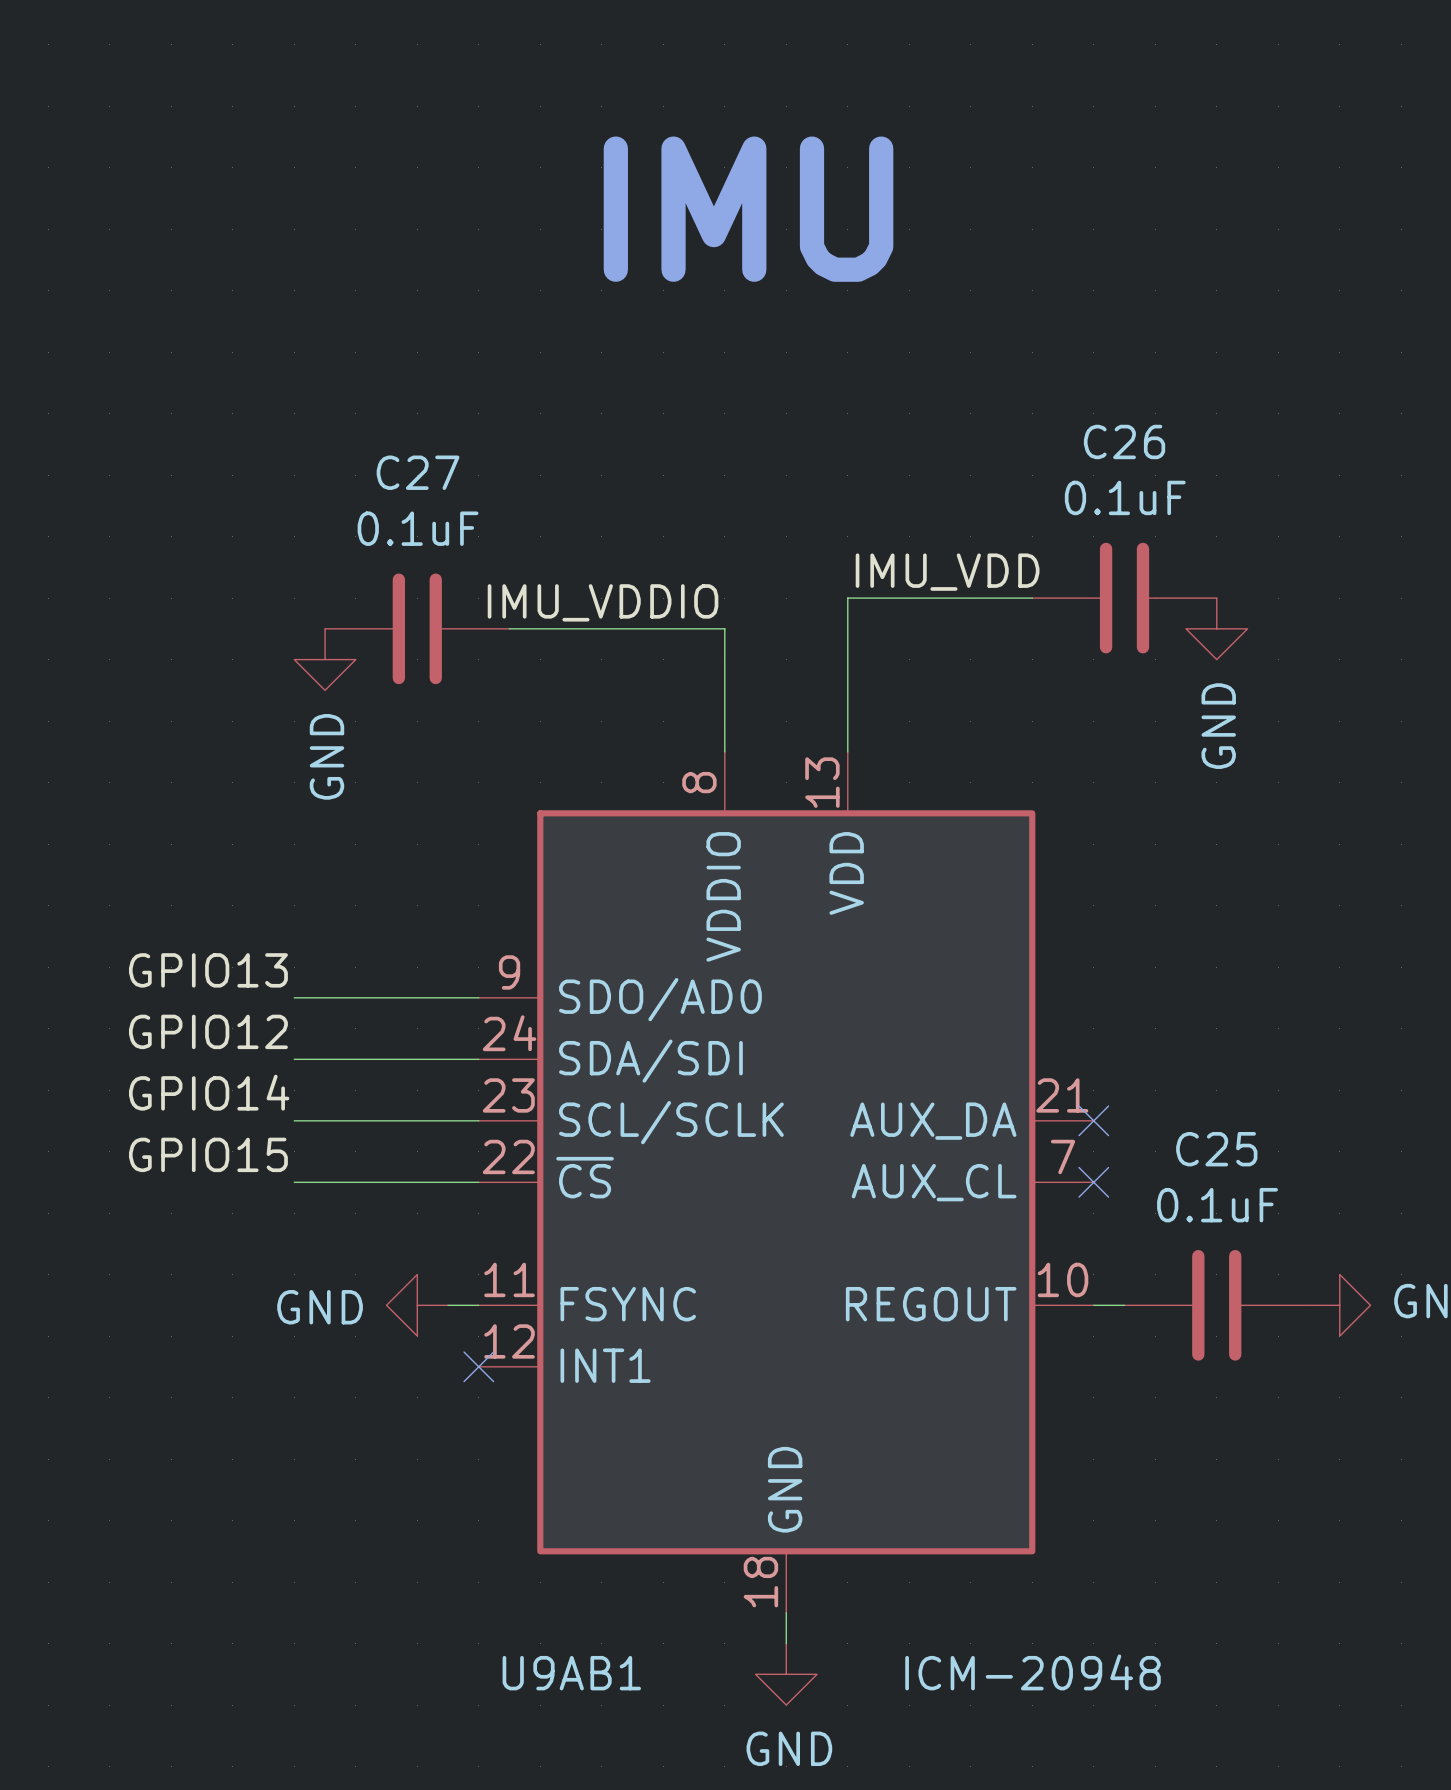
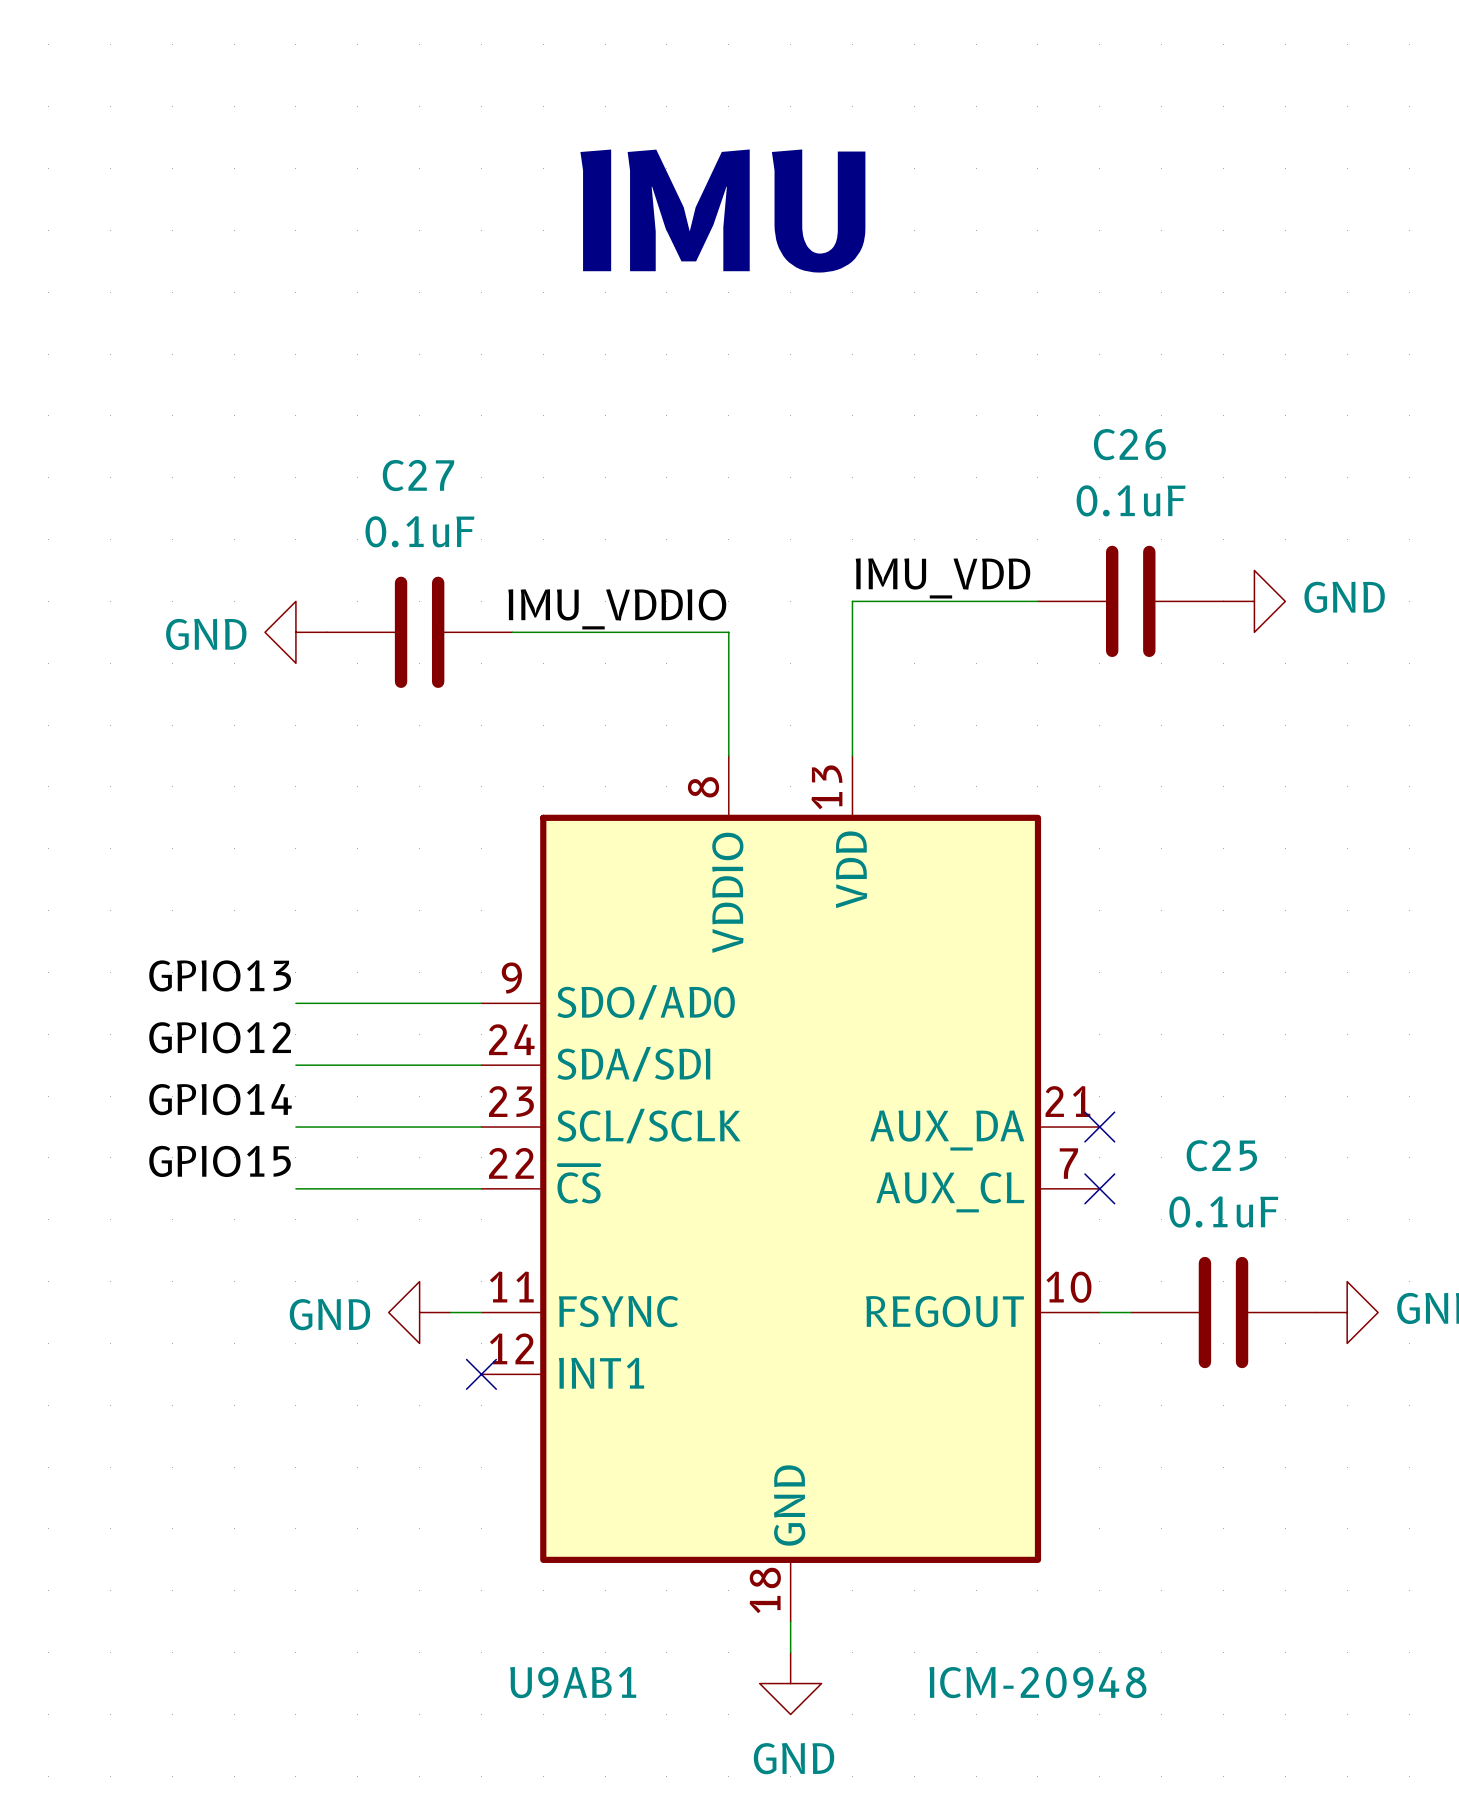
power symbol rotation: 0° (1216, 628) -> 90° counterclockwise (1254, 601)
power symbol position: GND (1216, 628) -> GND (1254, 601)
power symbol rotation: 0° (325, 659) -> 90° clockwise (295, 632)
power symbol position: GND (325, 659) -> GND (295, 632)

